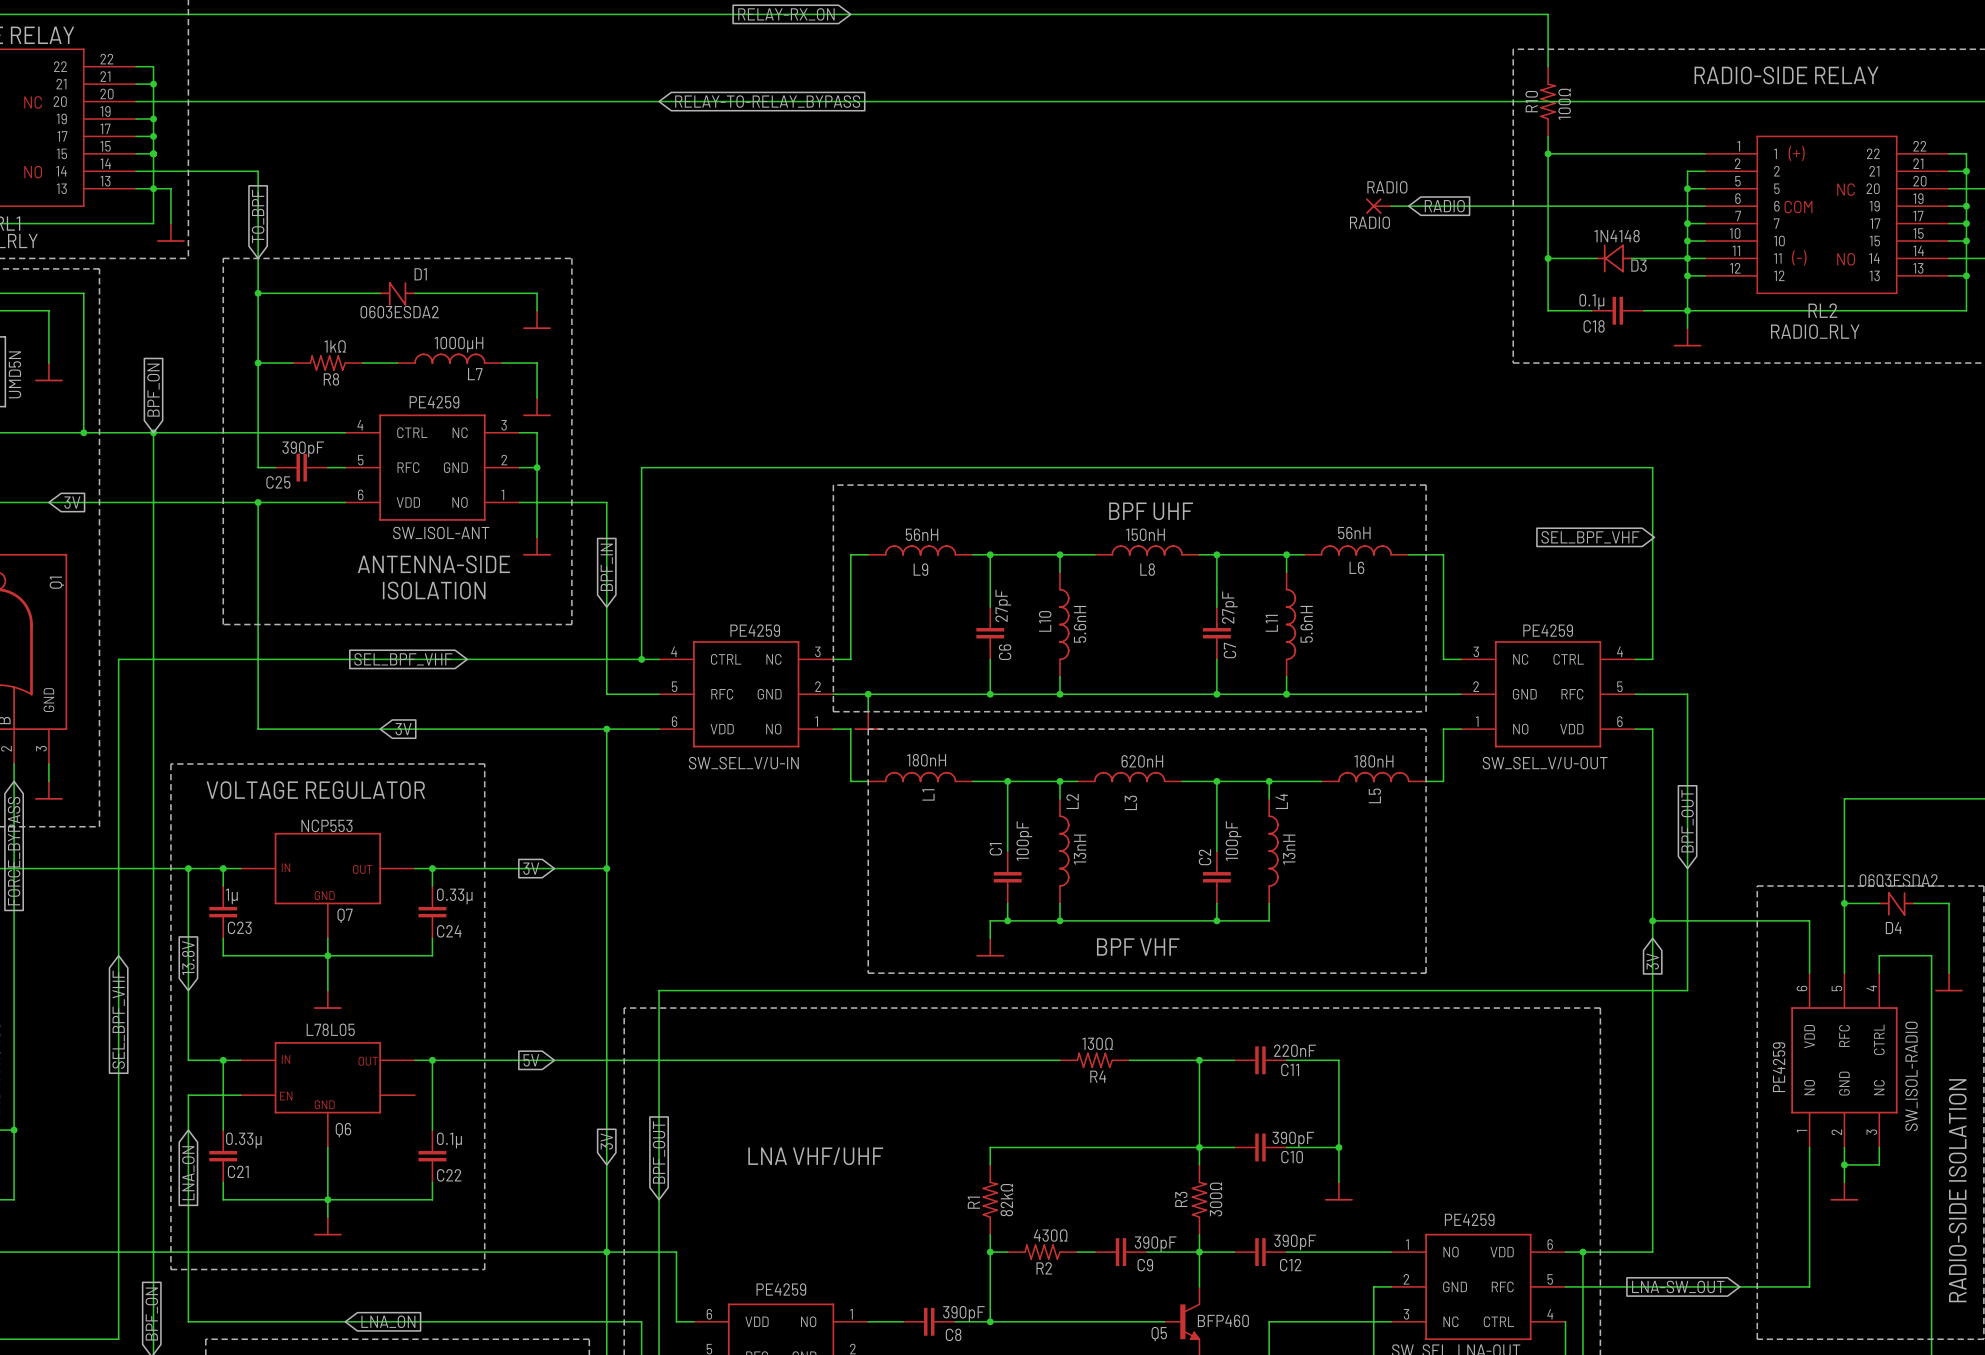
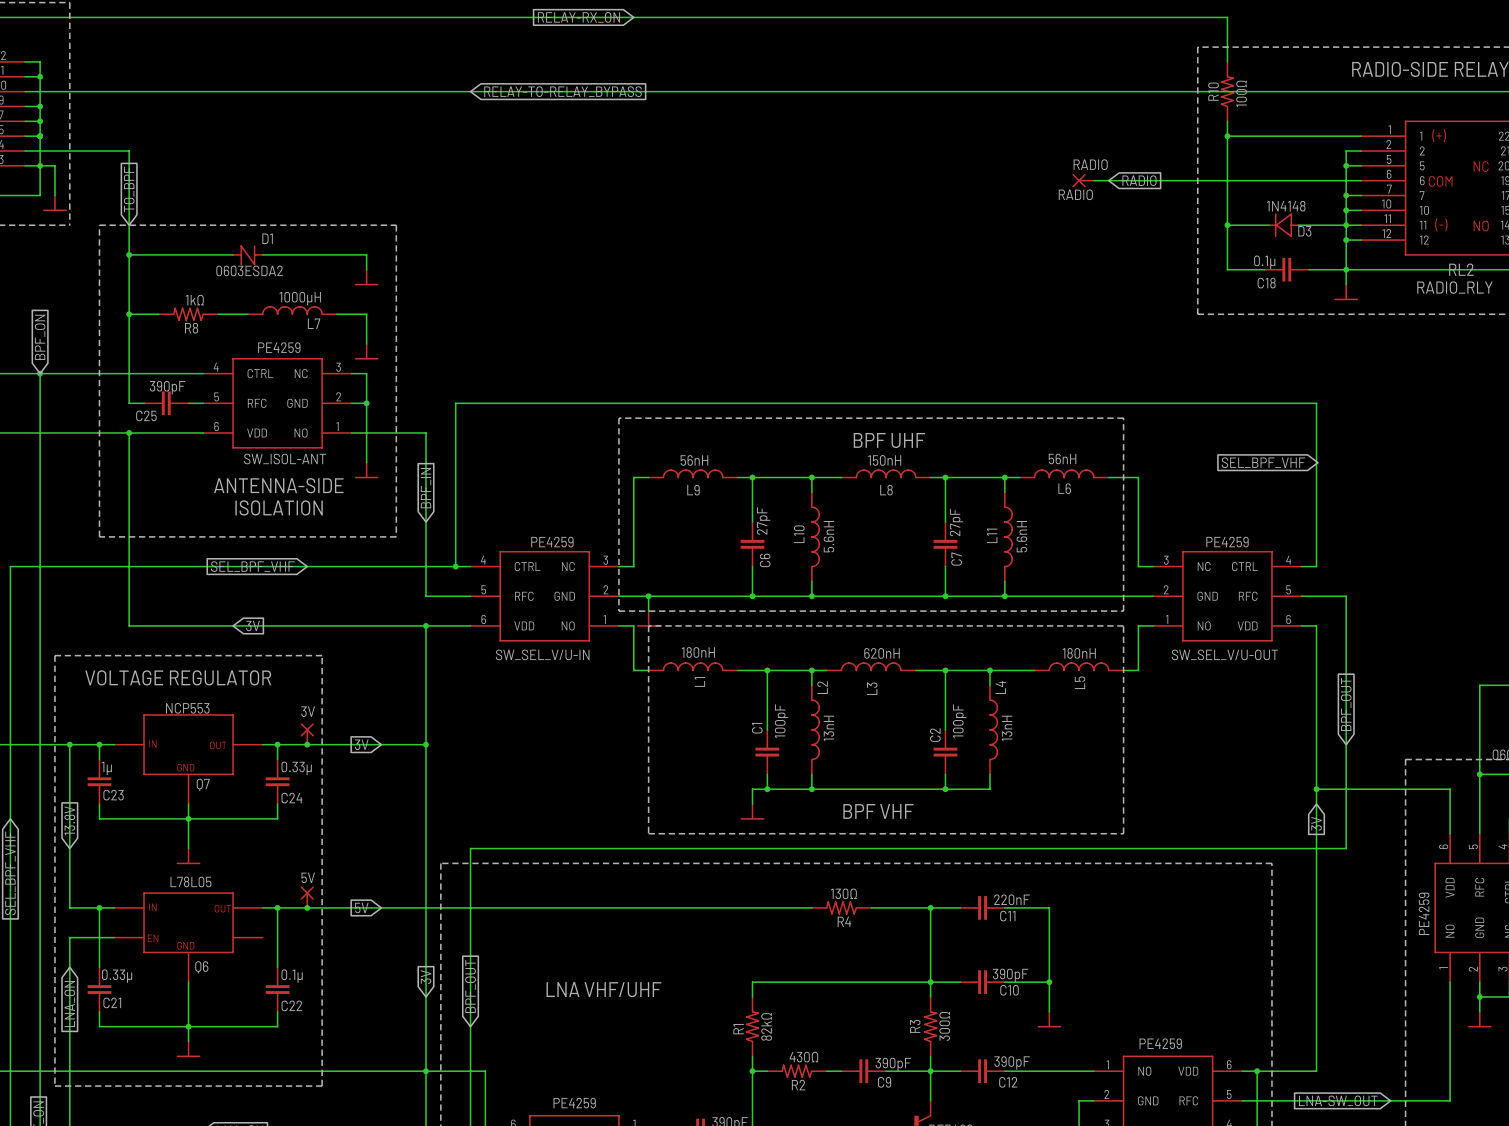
3V: none -> (307, 733)
junction: none -> (307, 744)
5V: none -> (307, 897)
junction: none -> (307, 907)

